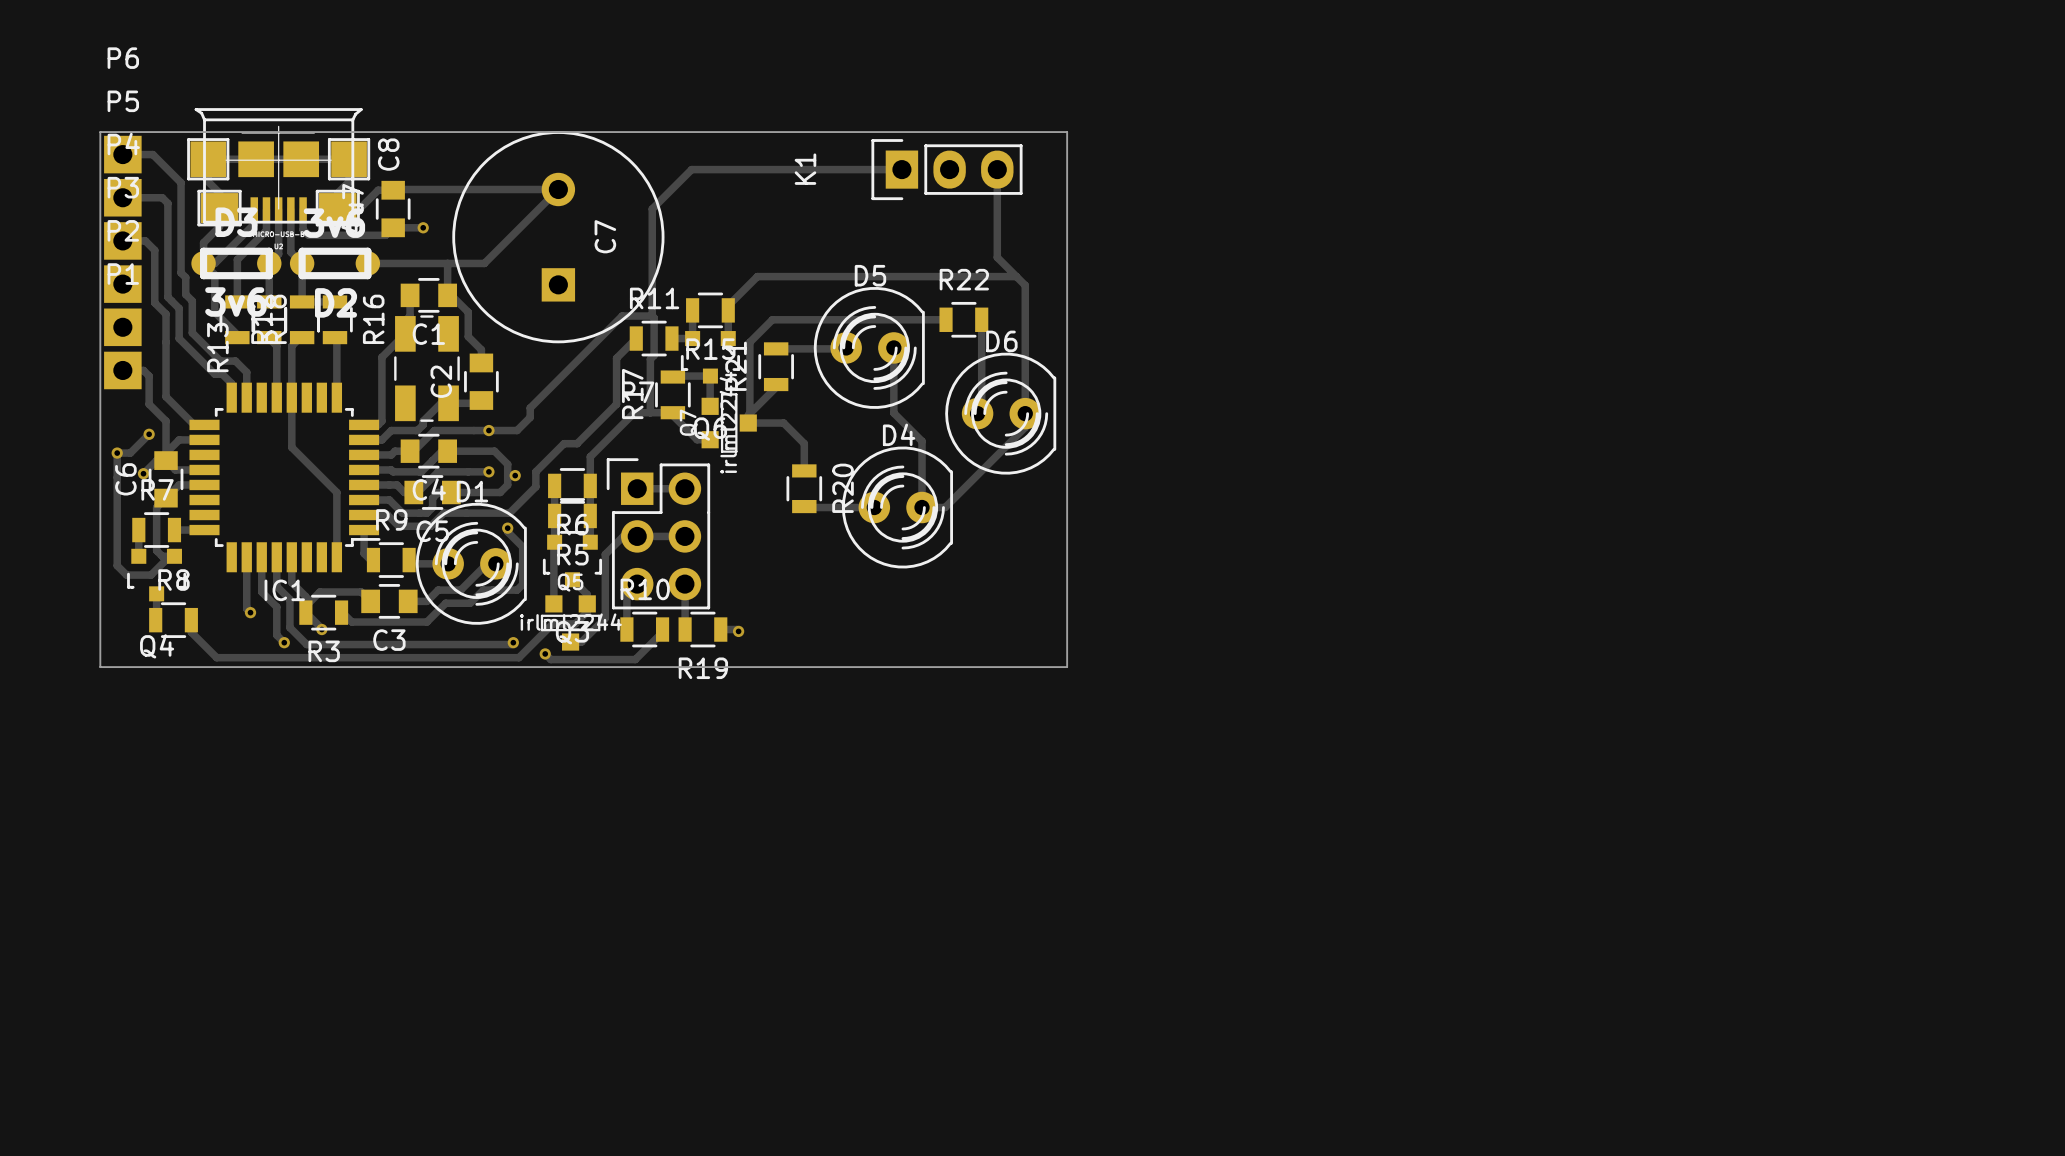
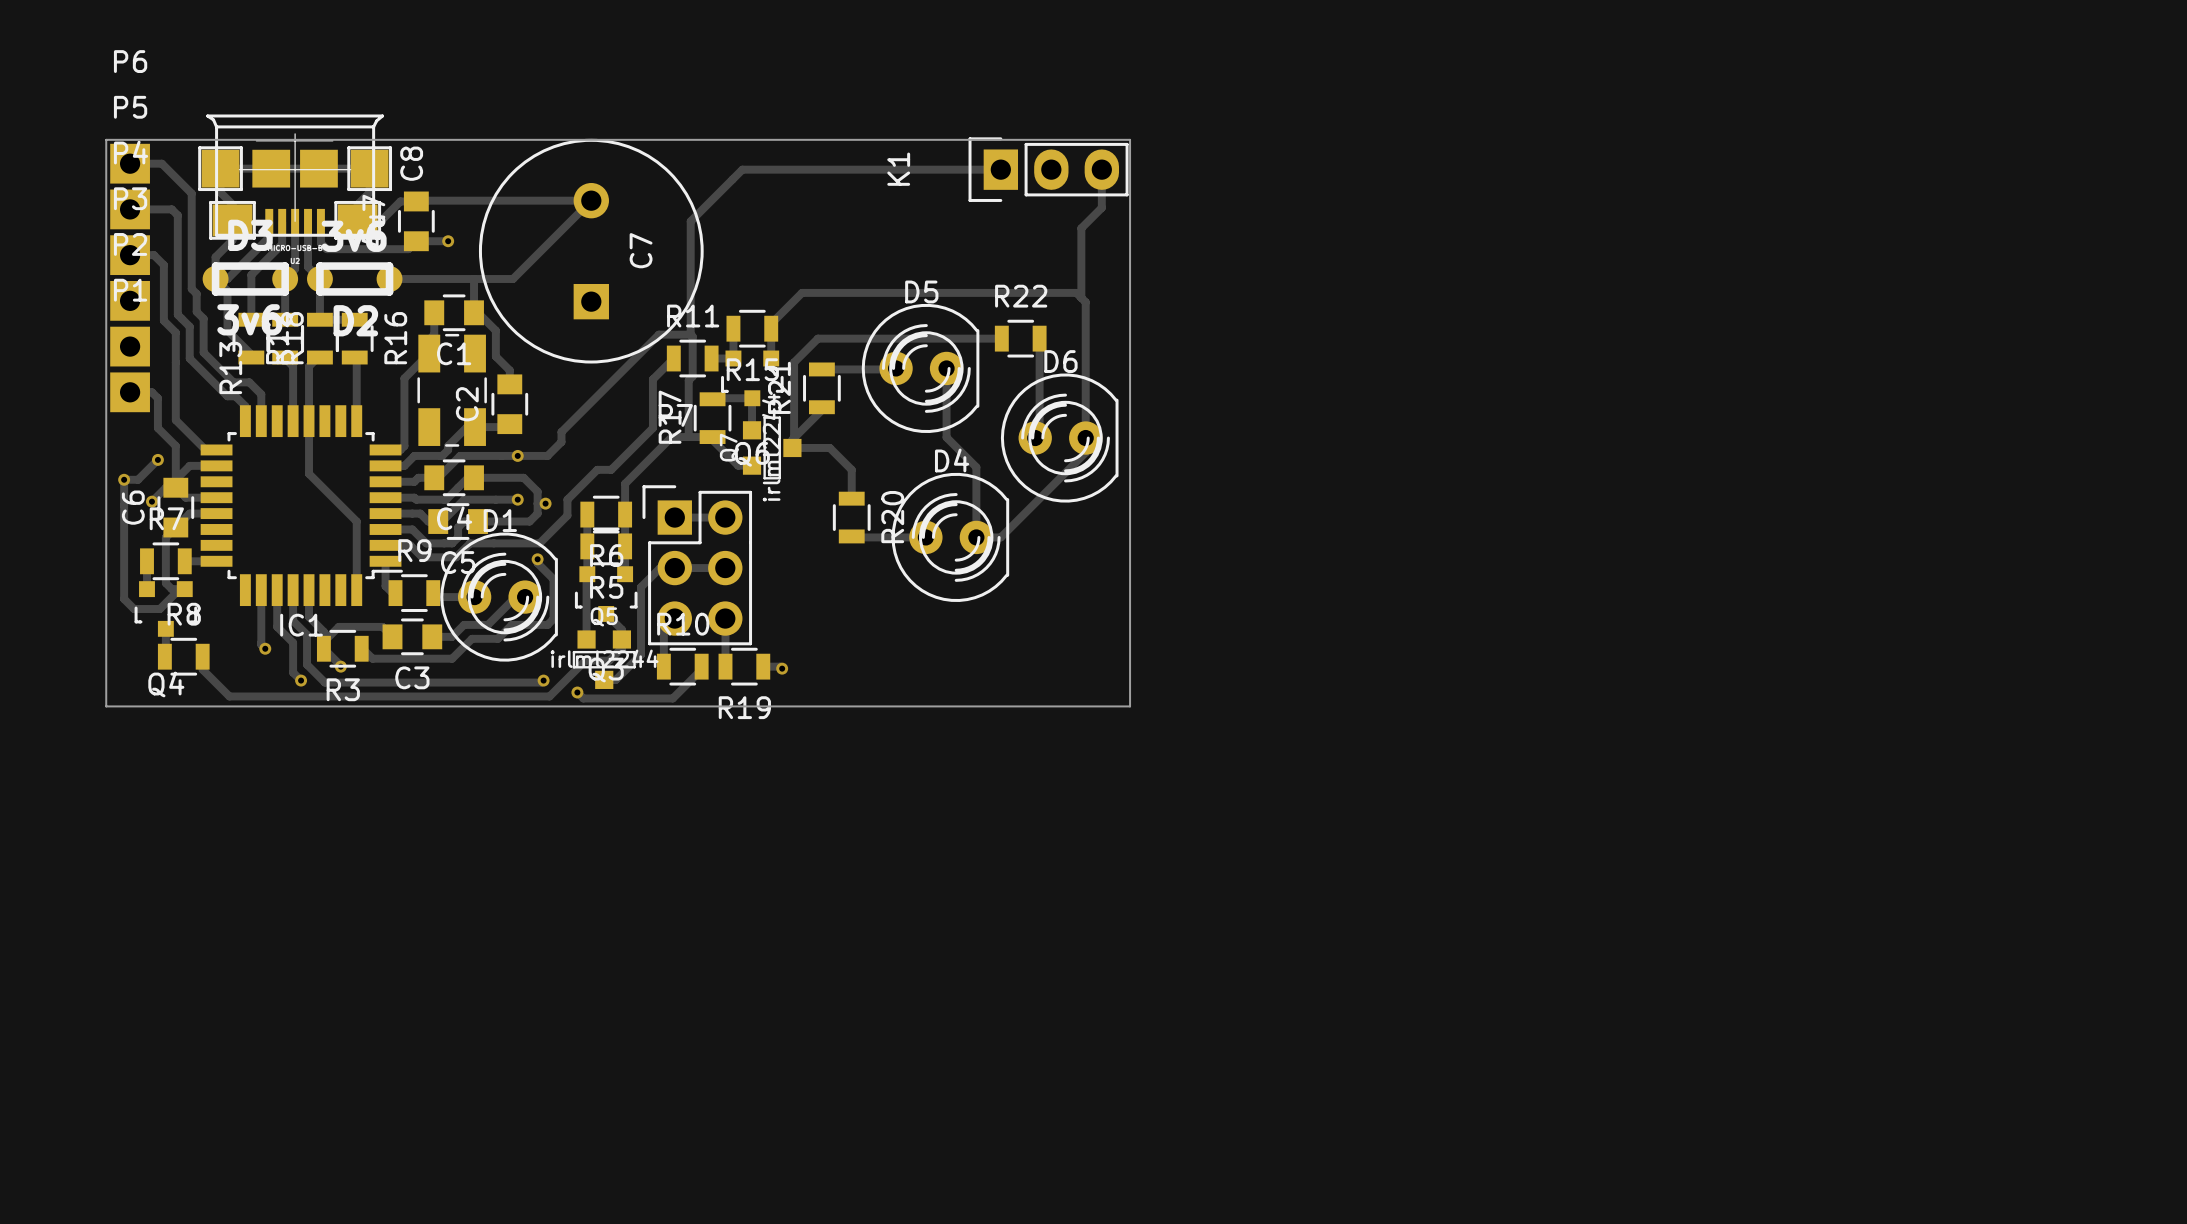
track: none -> (1101, 169) (1101, 207) (1081, 228) (1081, 297)
track: (691, 169) (901, 169) -> (732, 179) (742, 169) (1000, 169)
K1 position: (946, 169) -> (1048, 169)
track: (997, 169) (997, 257) (1016, 276) -> none

